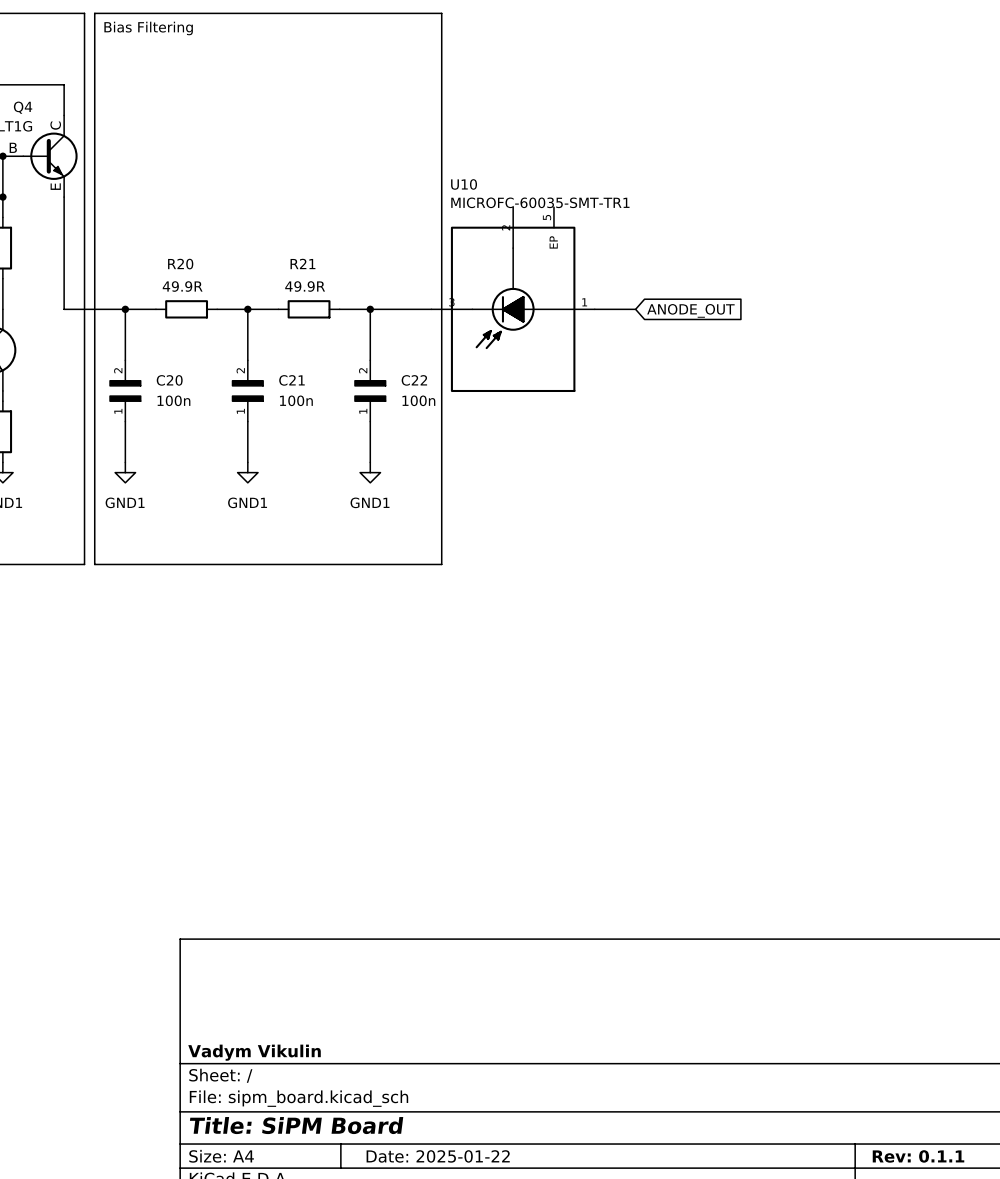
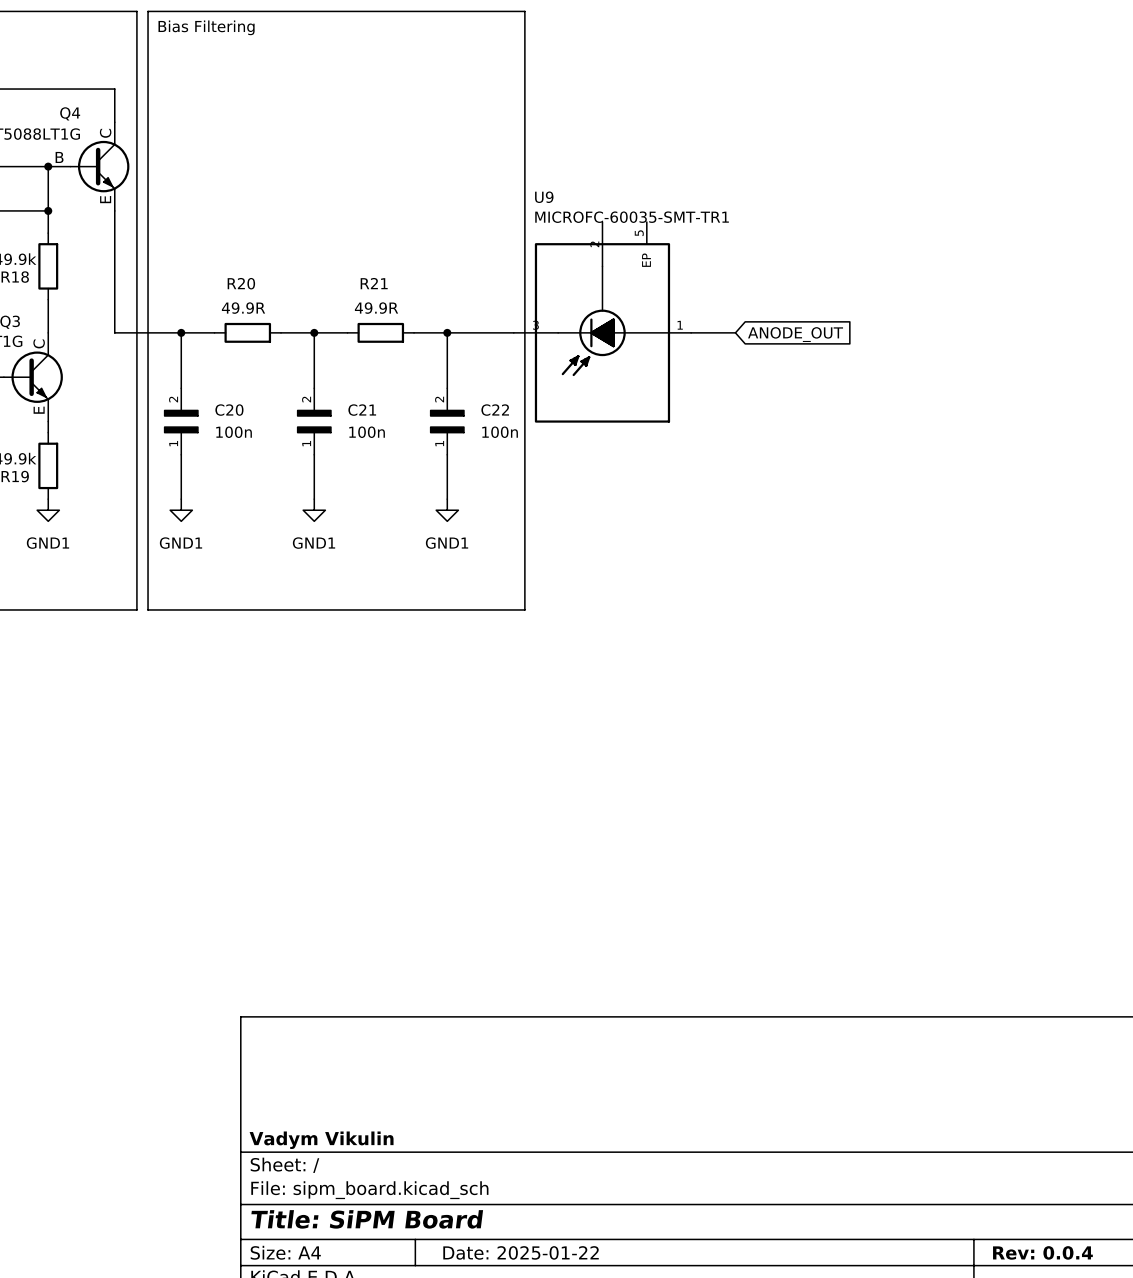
U10 name: U10 (464, 184) -> U9 (544, 197)
title block: Rev: 0.1.1 (918, 1156) -> Rev: 0.0.4 (1042, 1252)

